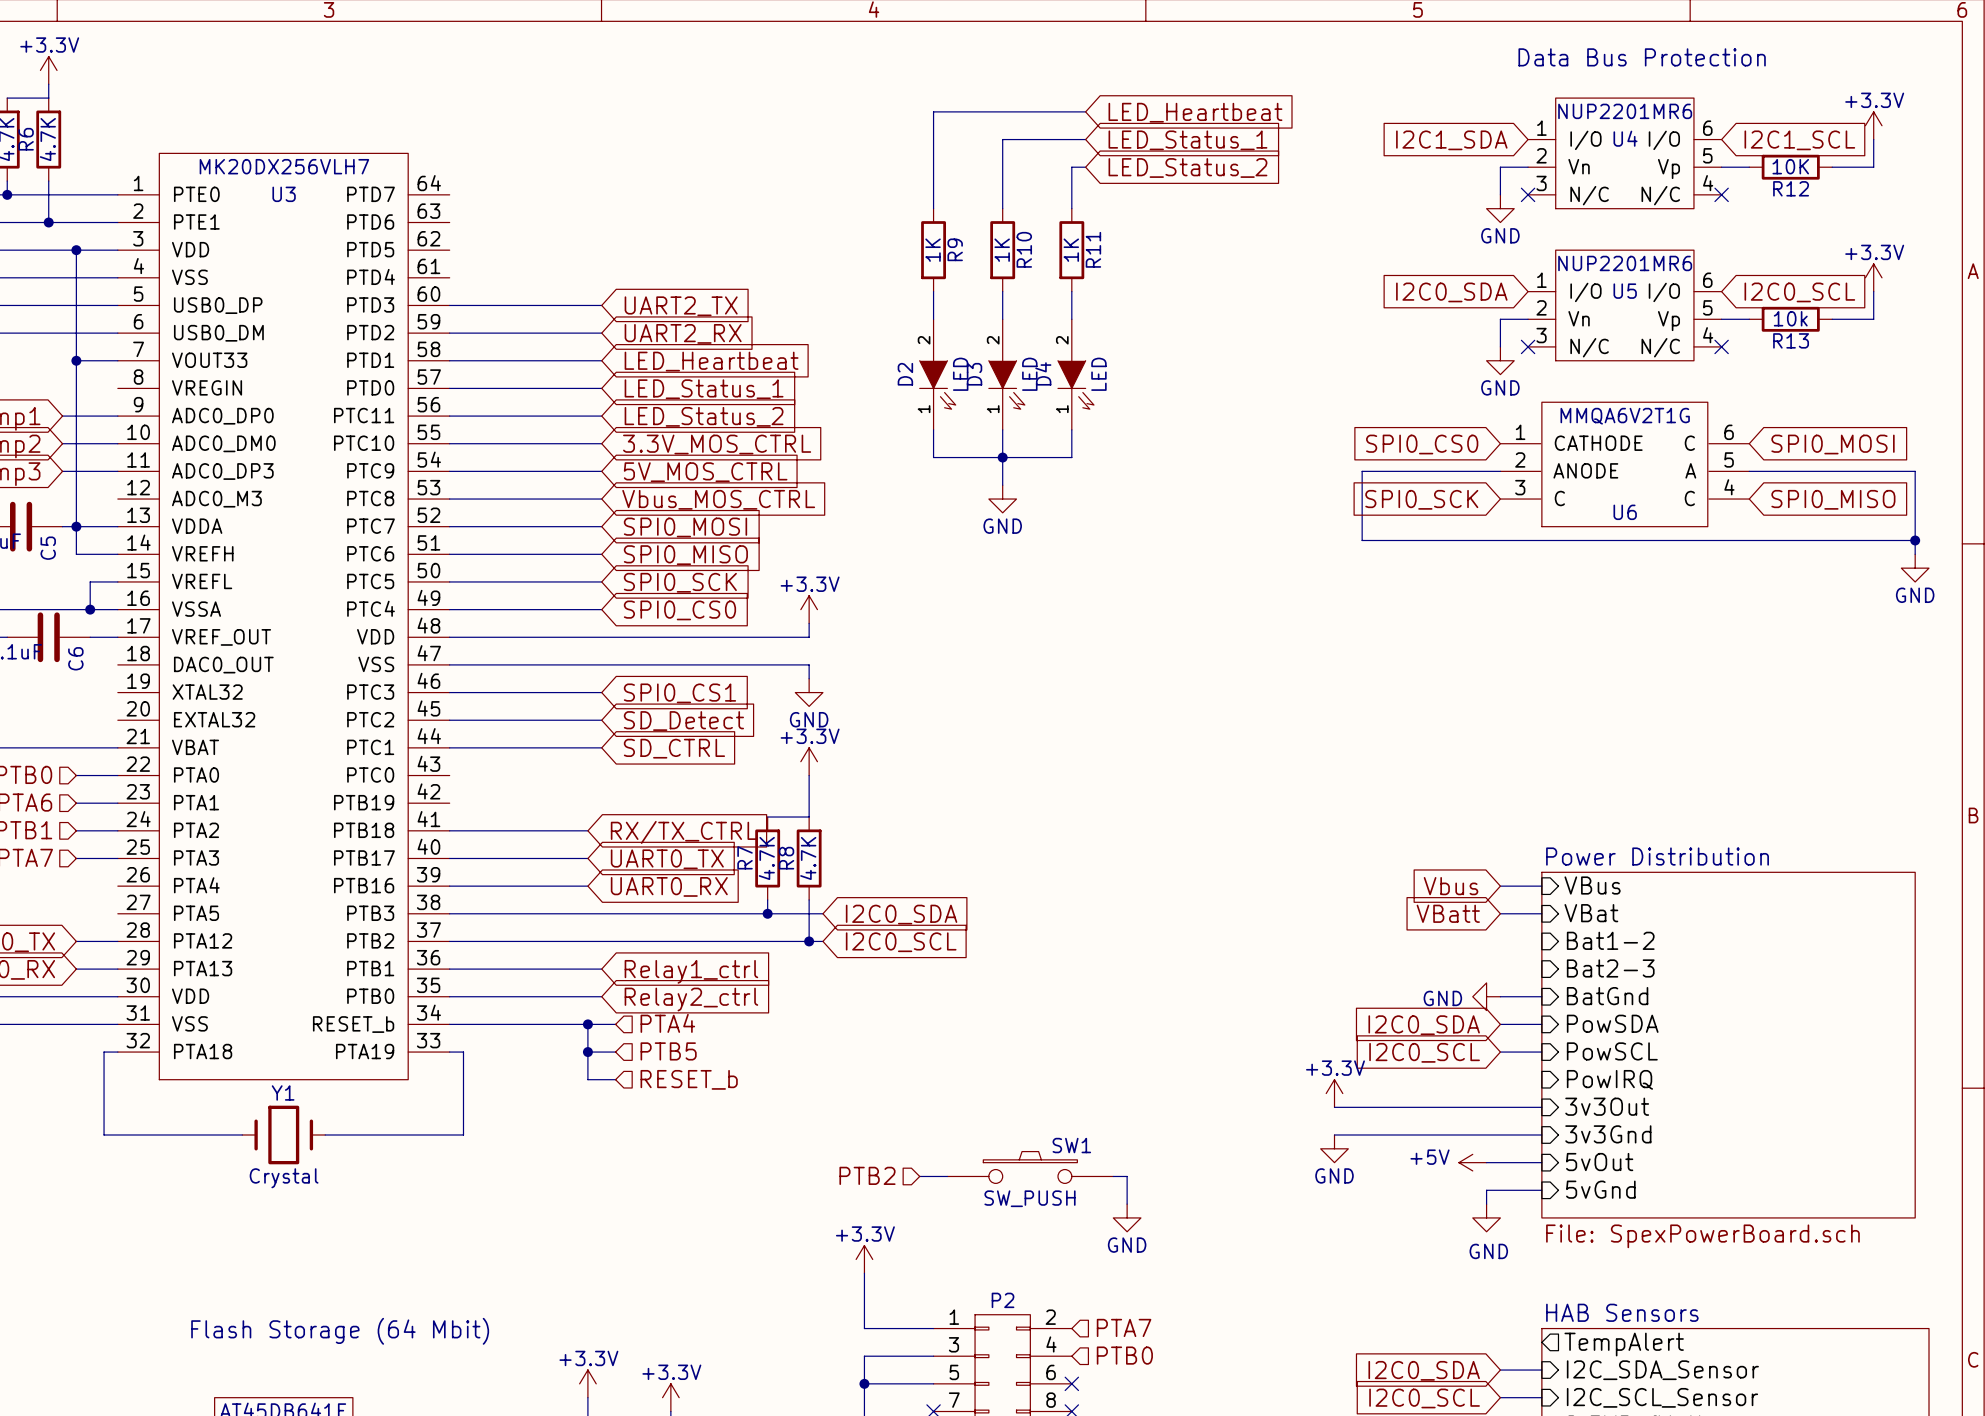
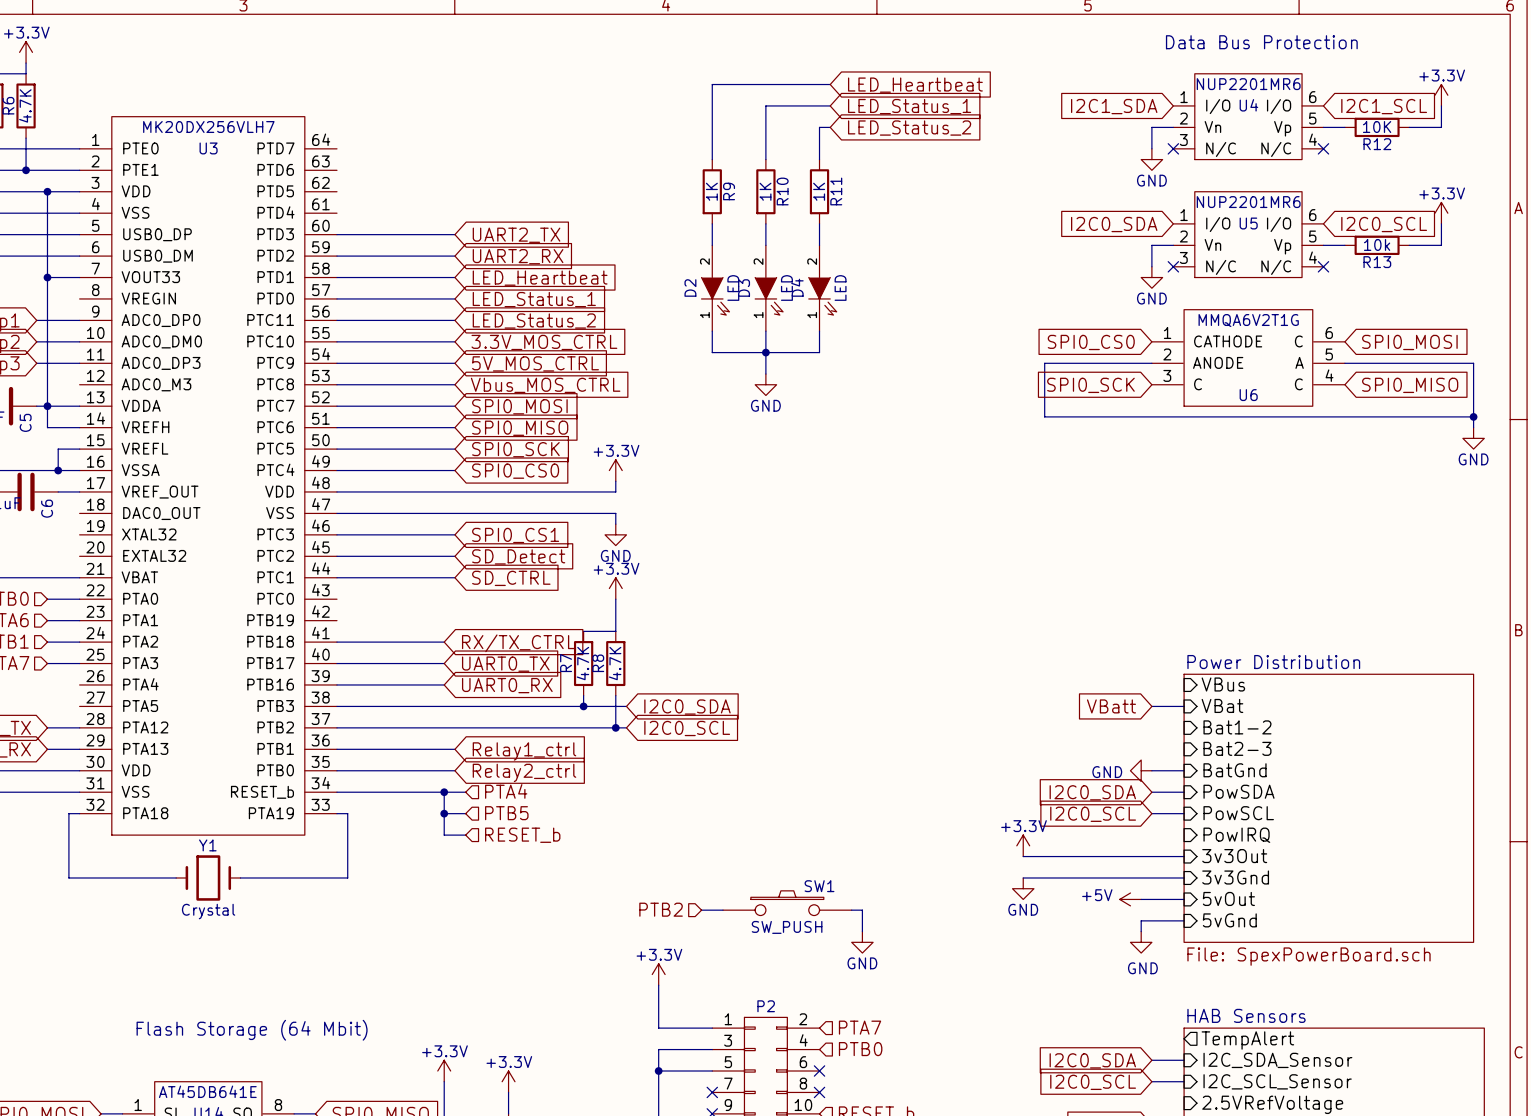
global label: Vbus (1451, 886) -> none
wire: (1500, 886) (1541, 886) -> none

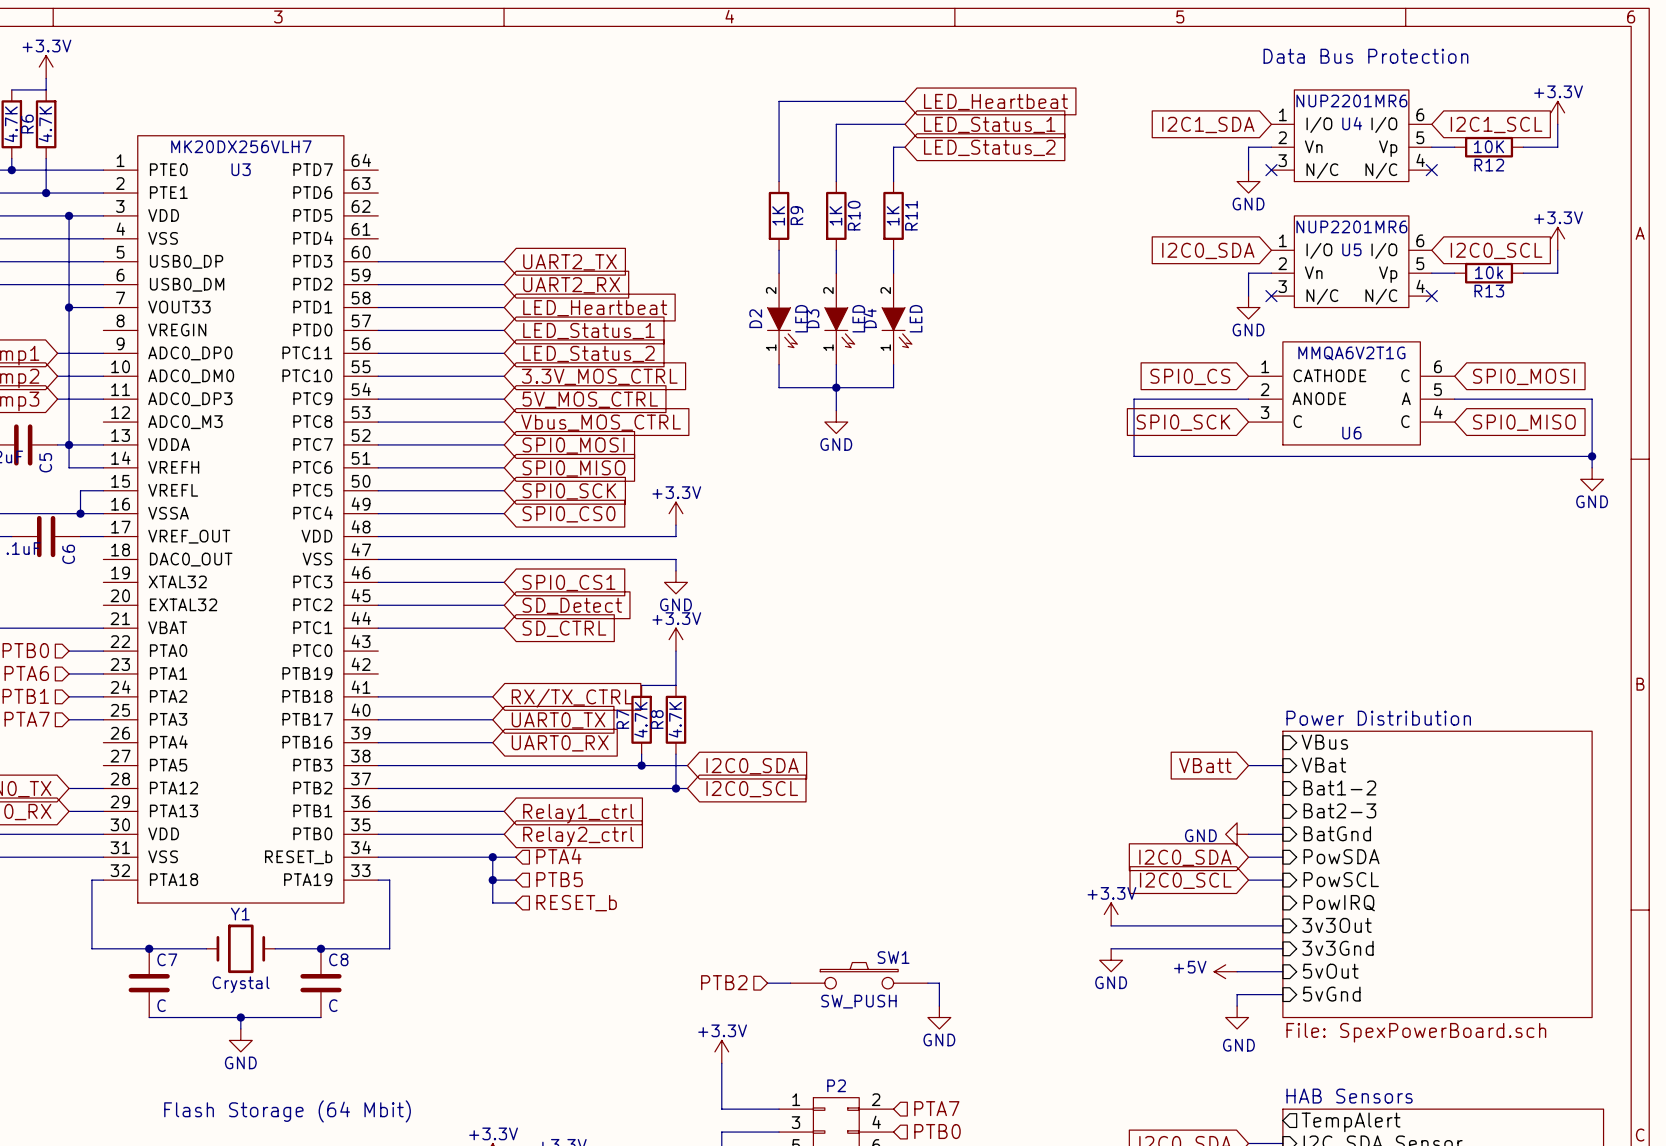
global label: SPI0_CS0 (1091, 342) -> SPI0_CS (1190, 376)
junction: none -> (149, 948)
junction: none -> (320, 948)
C7: none -> C (149, 983)
C8: none -> C (320, 983)
wire: none -> (149, 1017) (320, 1017)
wire: none -> (240, 1017) (240, 1028)
junction: none -> (240, 1017)
power symbol: none -> GND (240, 1040)

